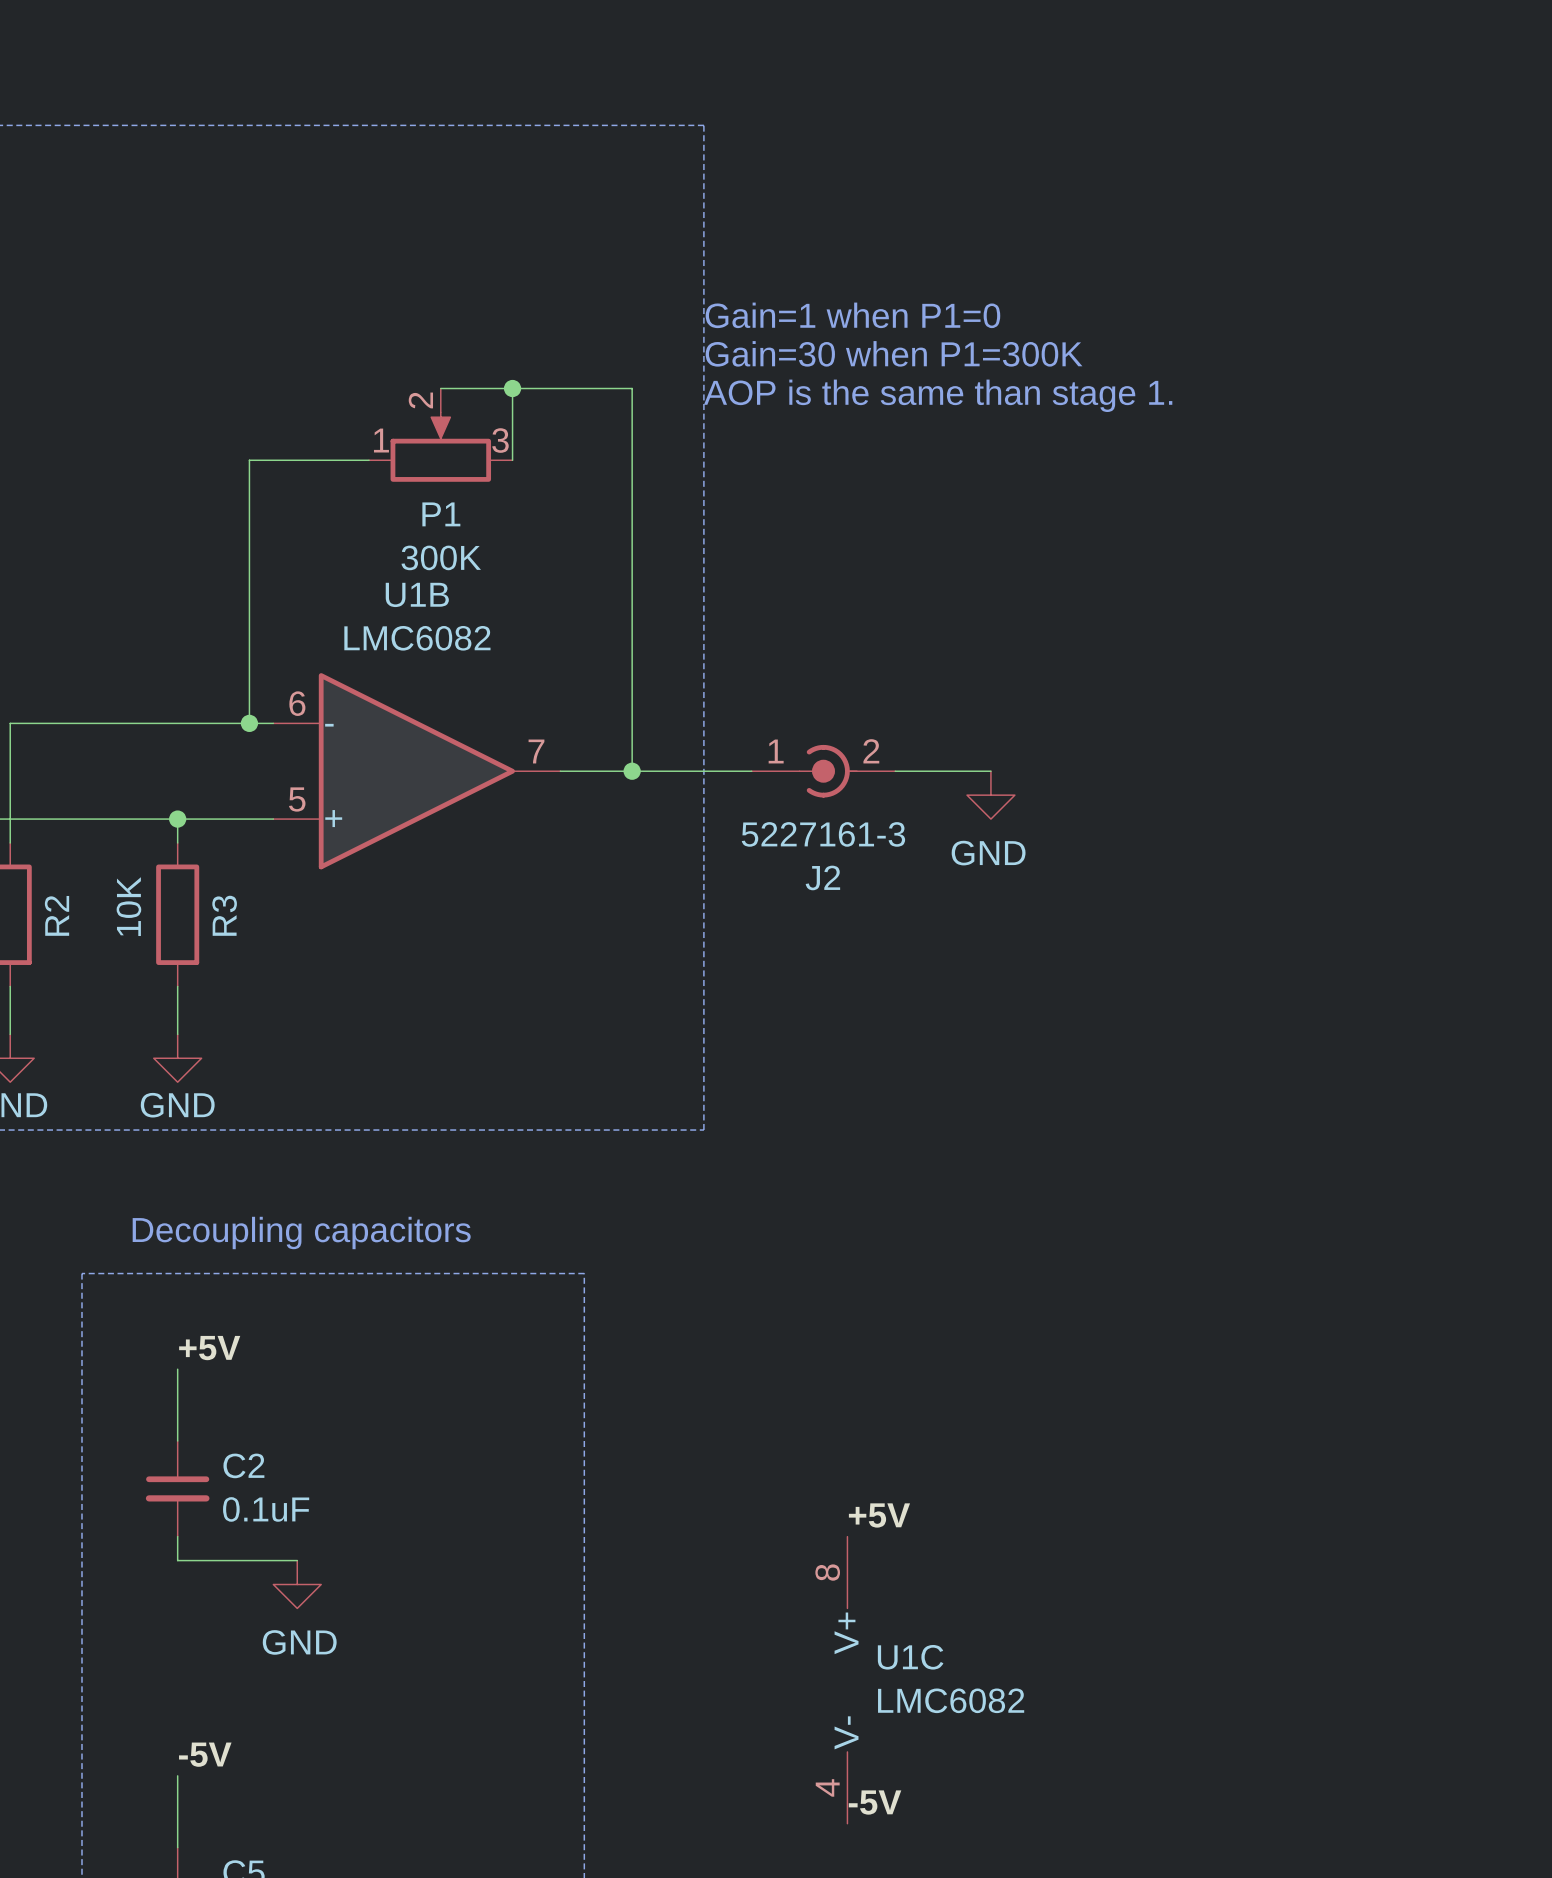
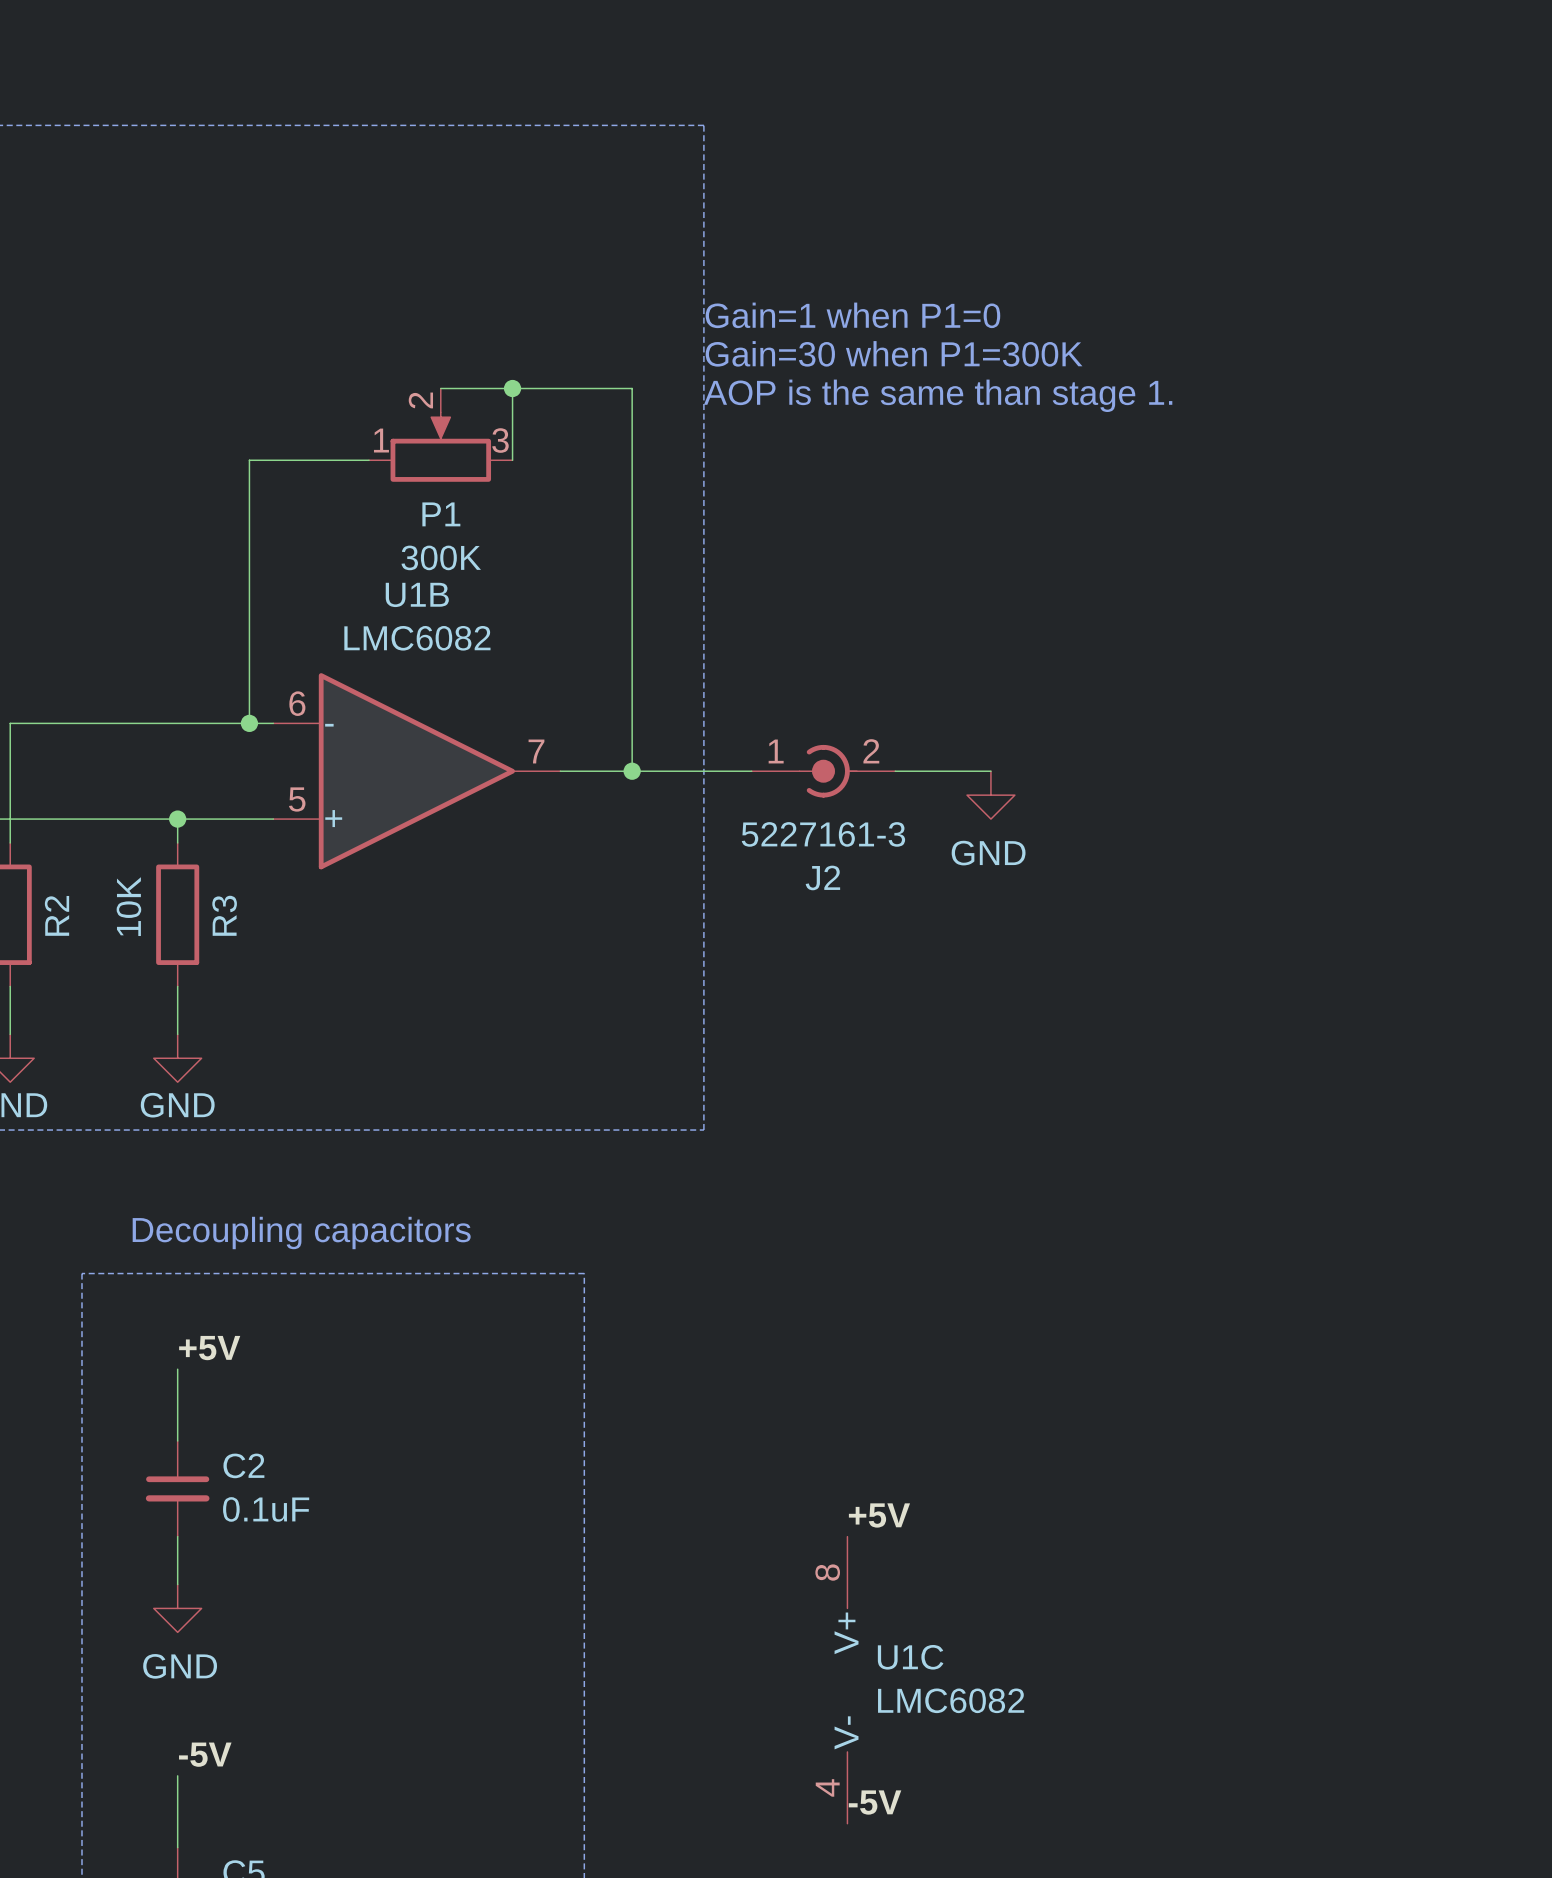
wire: (177, 1560) (297, 1560) -> (177, 1560) (177, 1584)
power symbol position: GND (297, 1584) -> GND (177, 1608)

